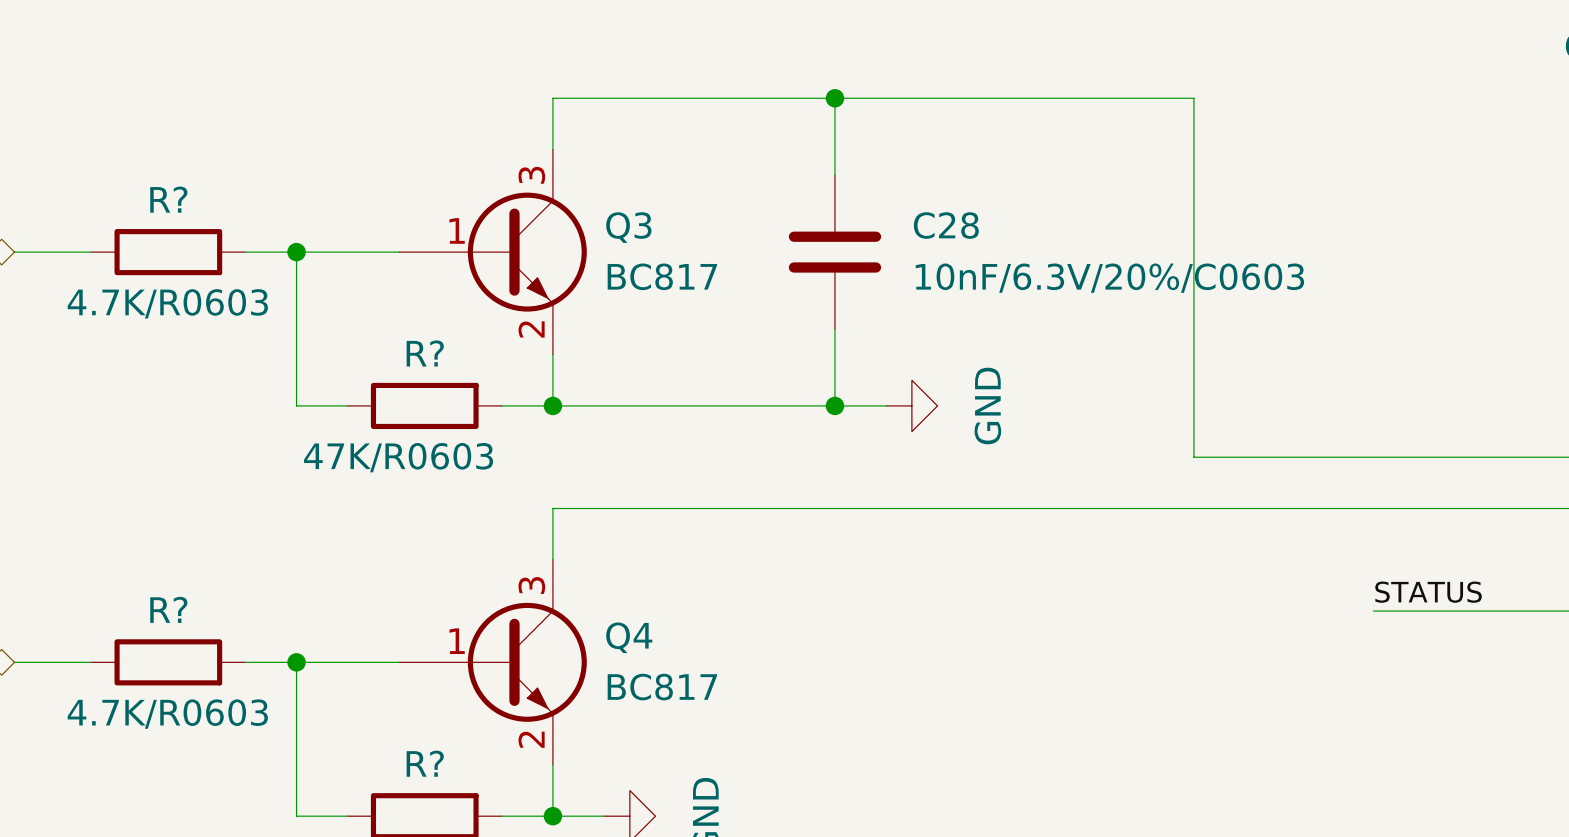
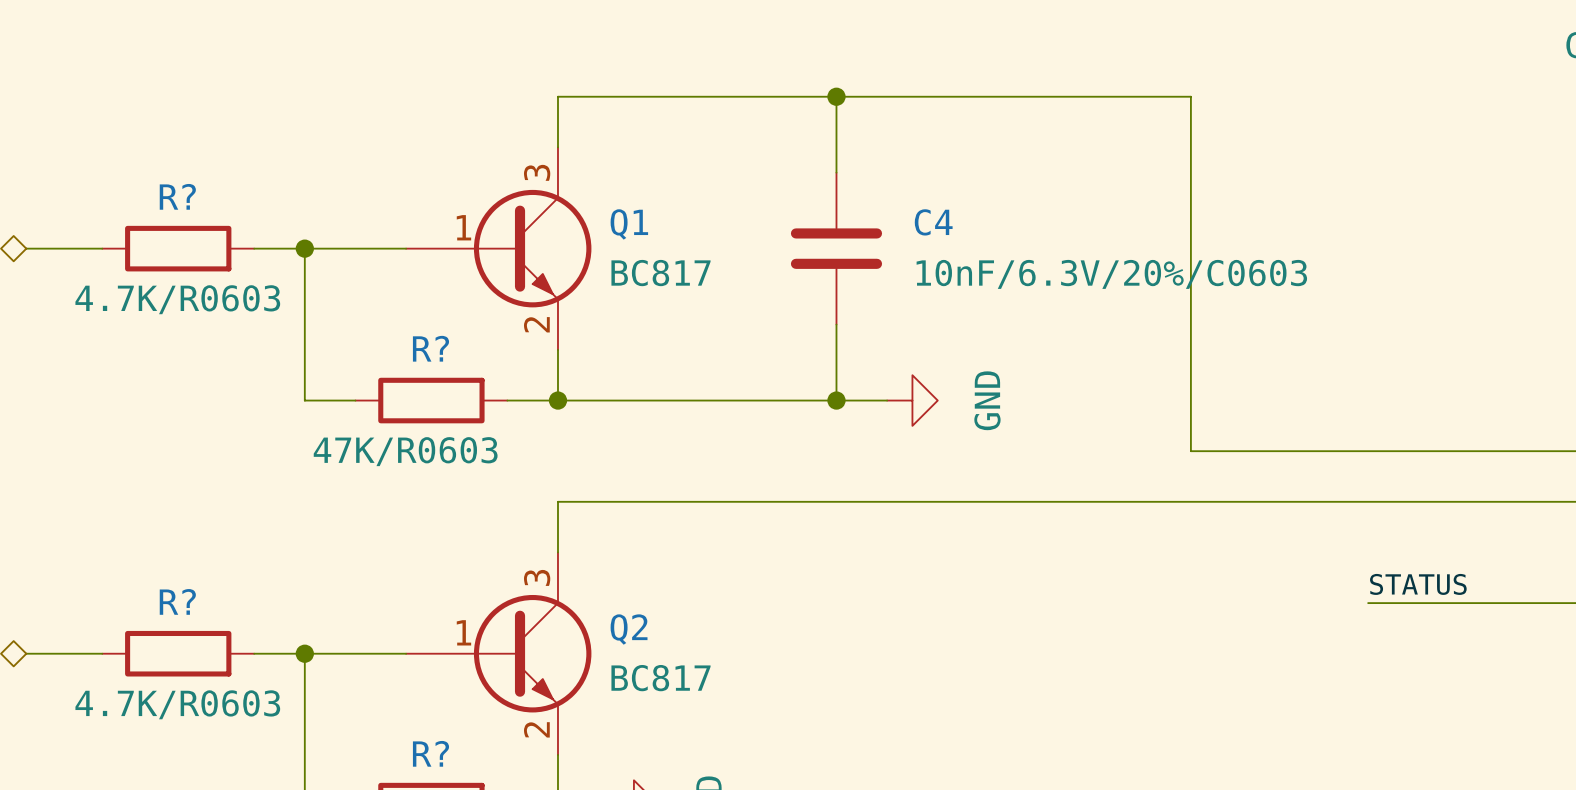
C28 name: C28 (946, 225) -> C4 (933, 222)
Q3 name: Q3 (628, 227) -> Q1 (629, 224)
Q4 name: Q4 (629, 637) -> Q2 (629, 629)

